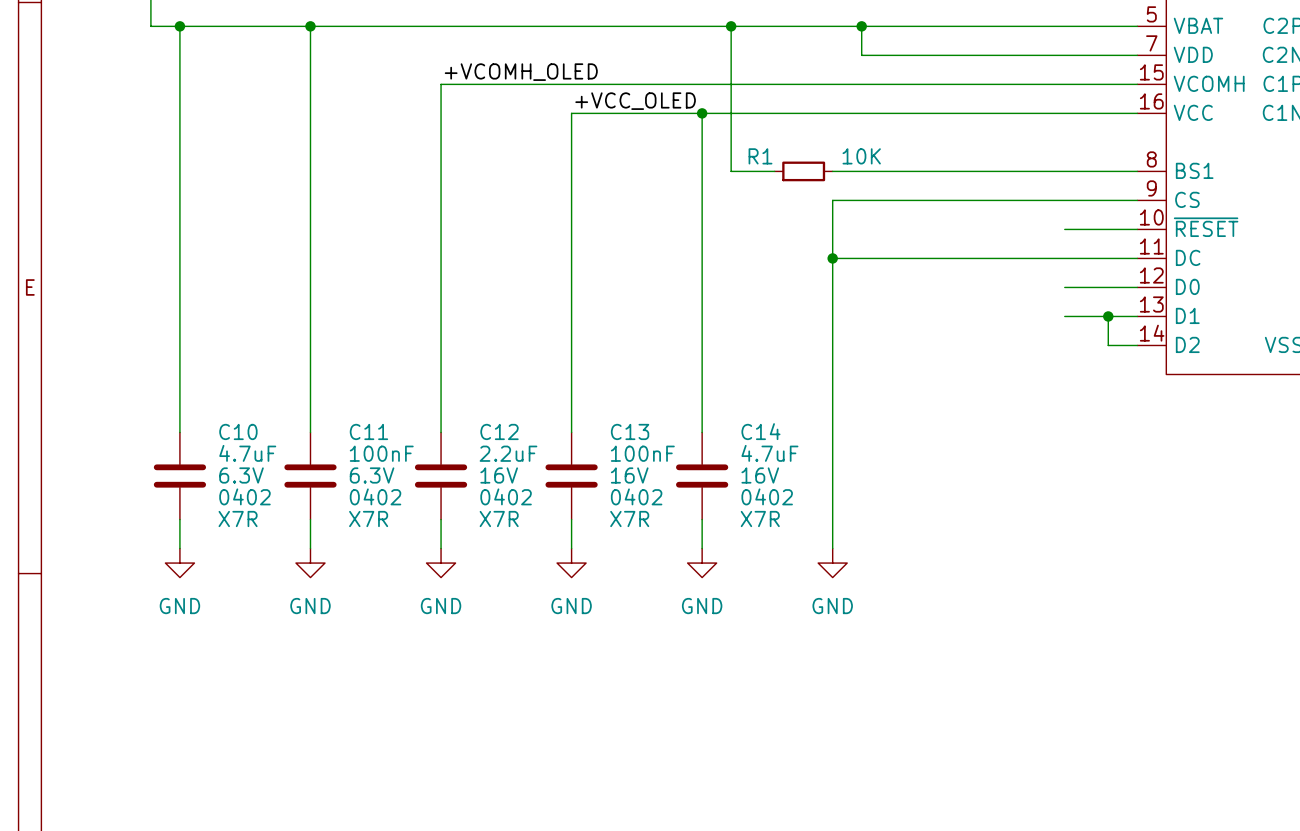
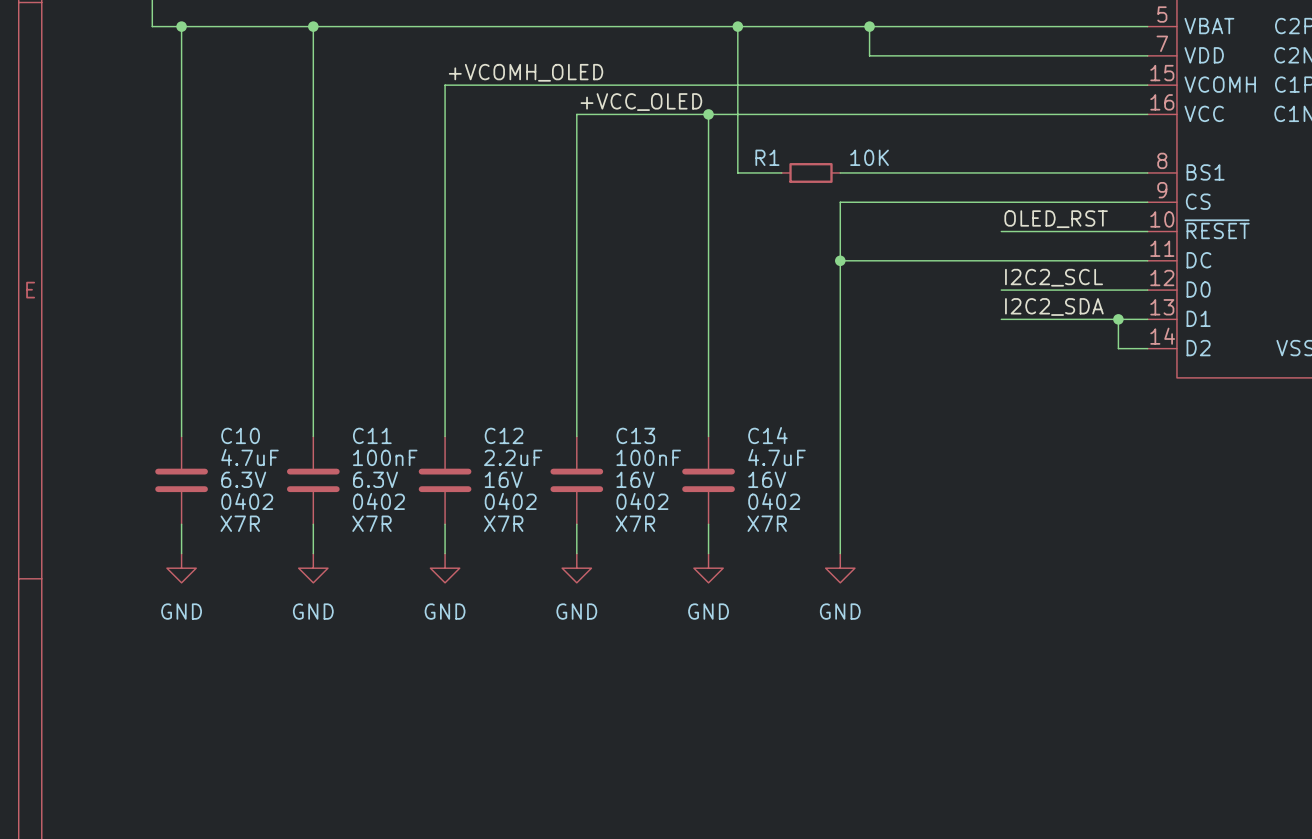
label: none -> OLED_RST (1056, 219)
wire: none -> (1001, 231) (1074, 231)
label: none -> I2C2_SCL (1054, 277)
wire: none -> (1001, 290) (1074, 290)
label: none -> I2C2_SDA (1054, 306)
wire: none -> (1001, 319) (1074, 319)

